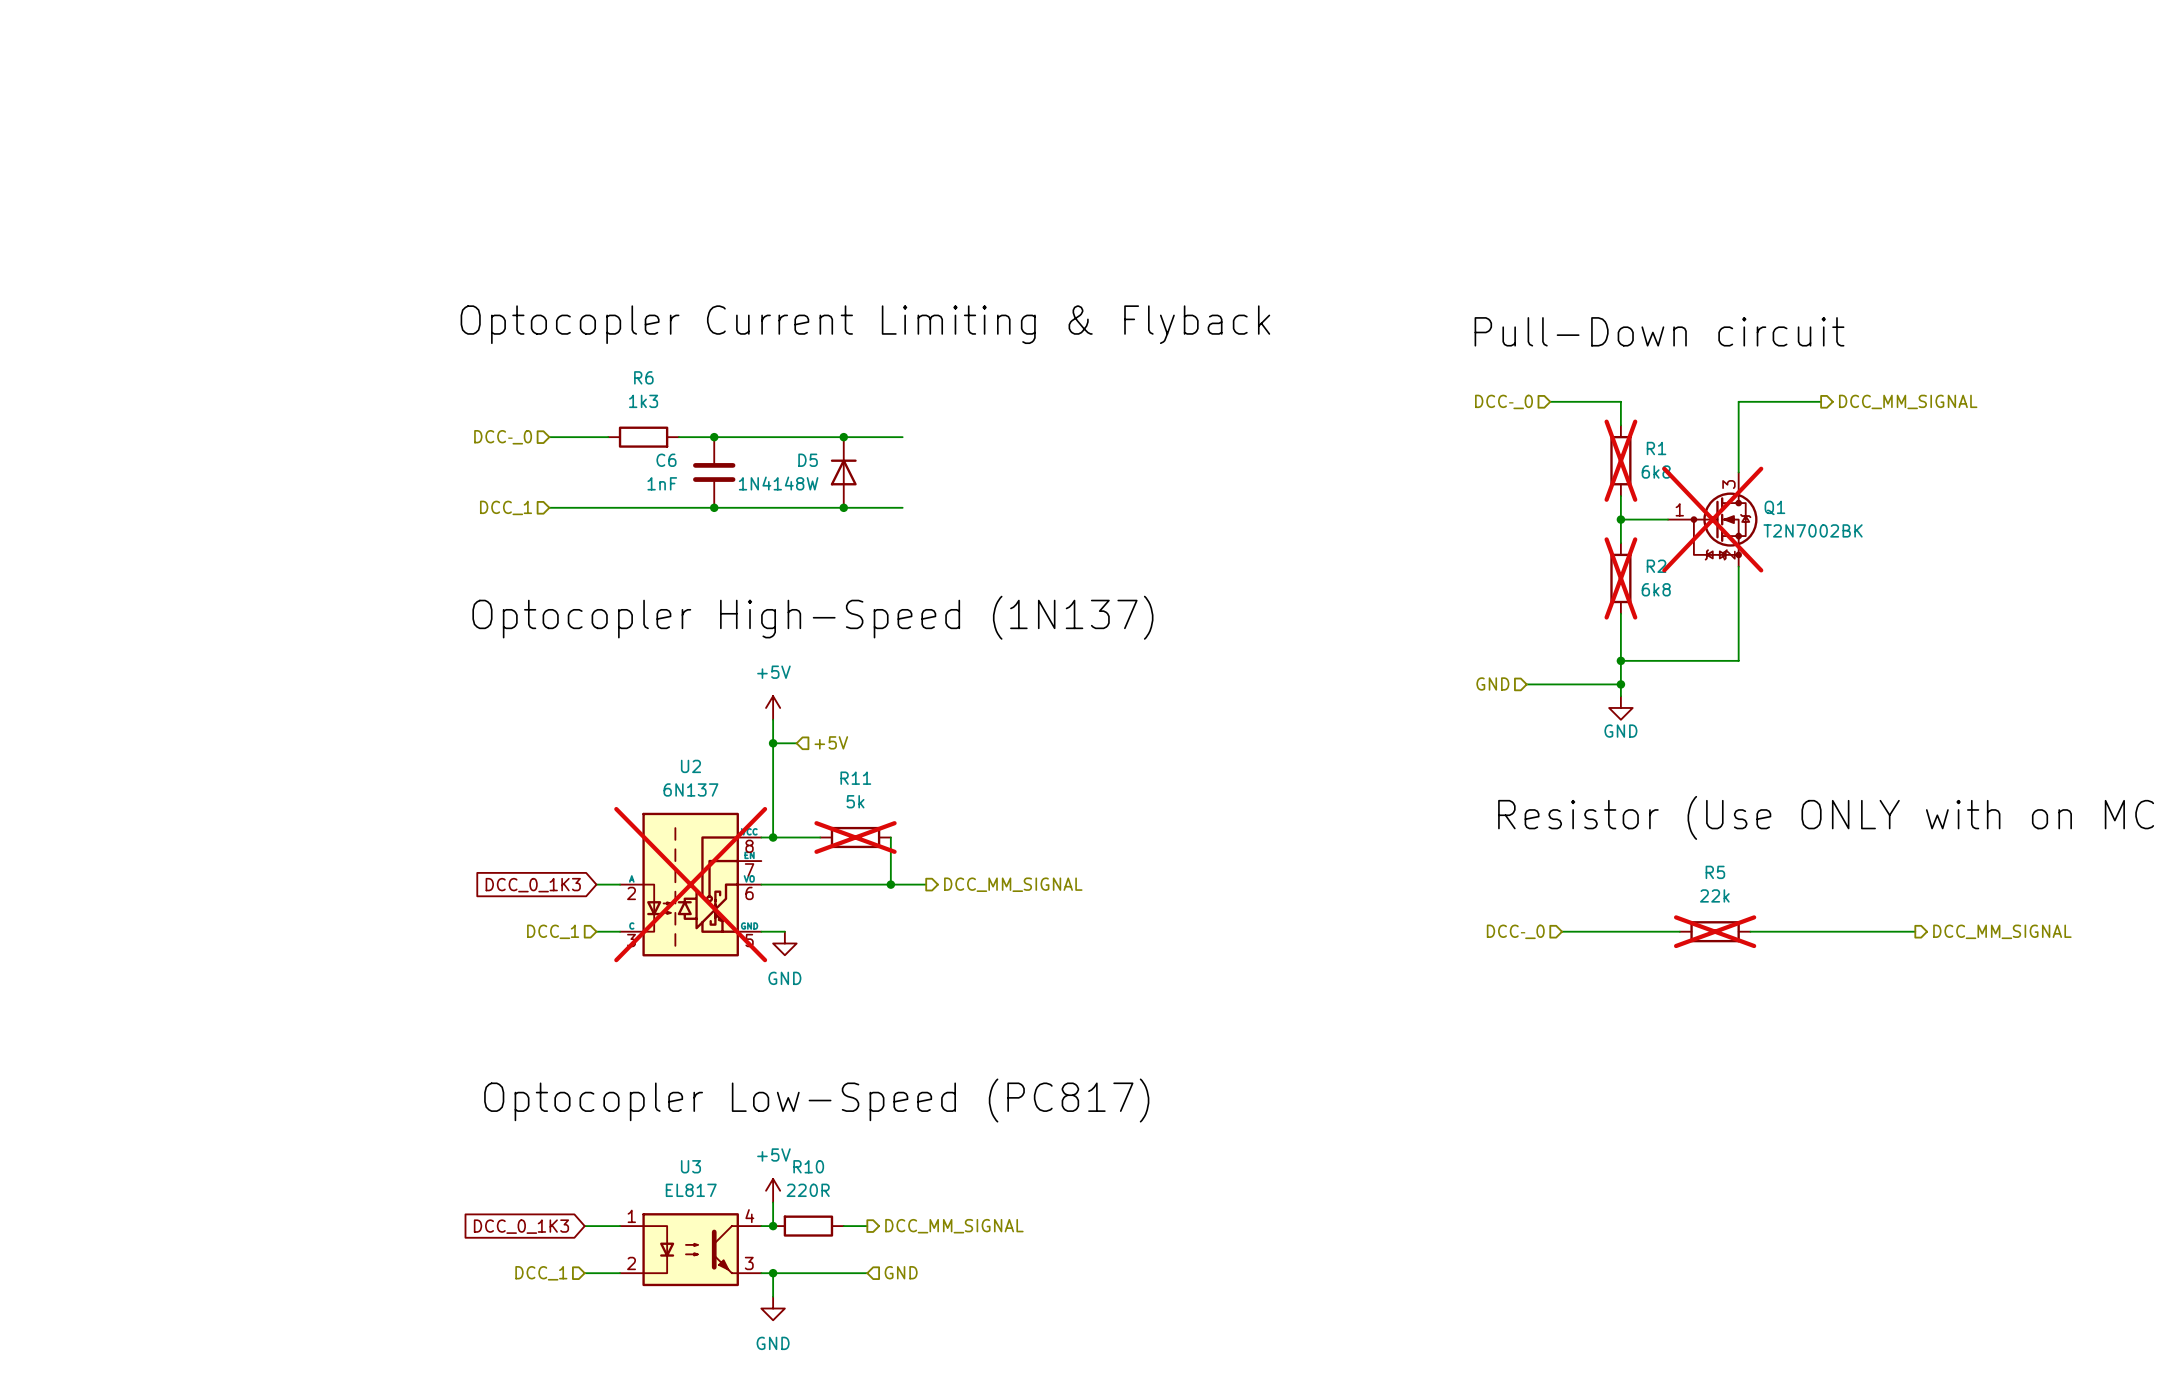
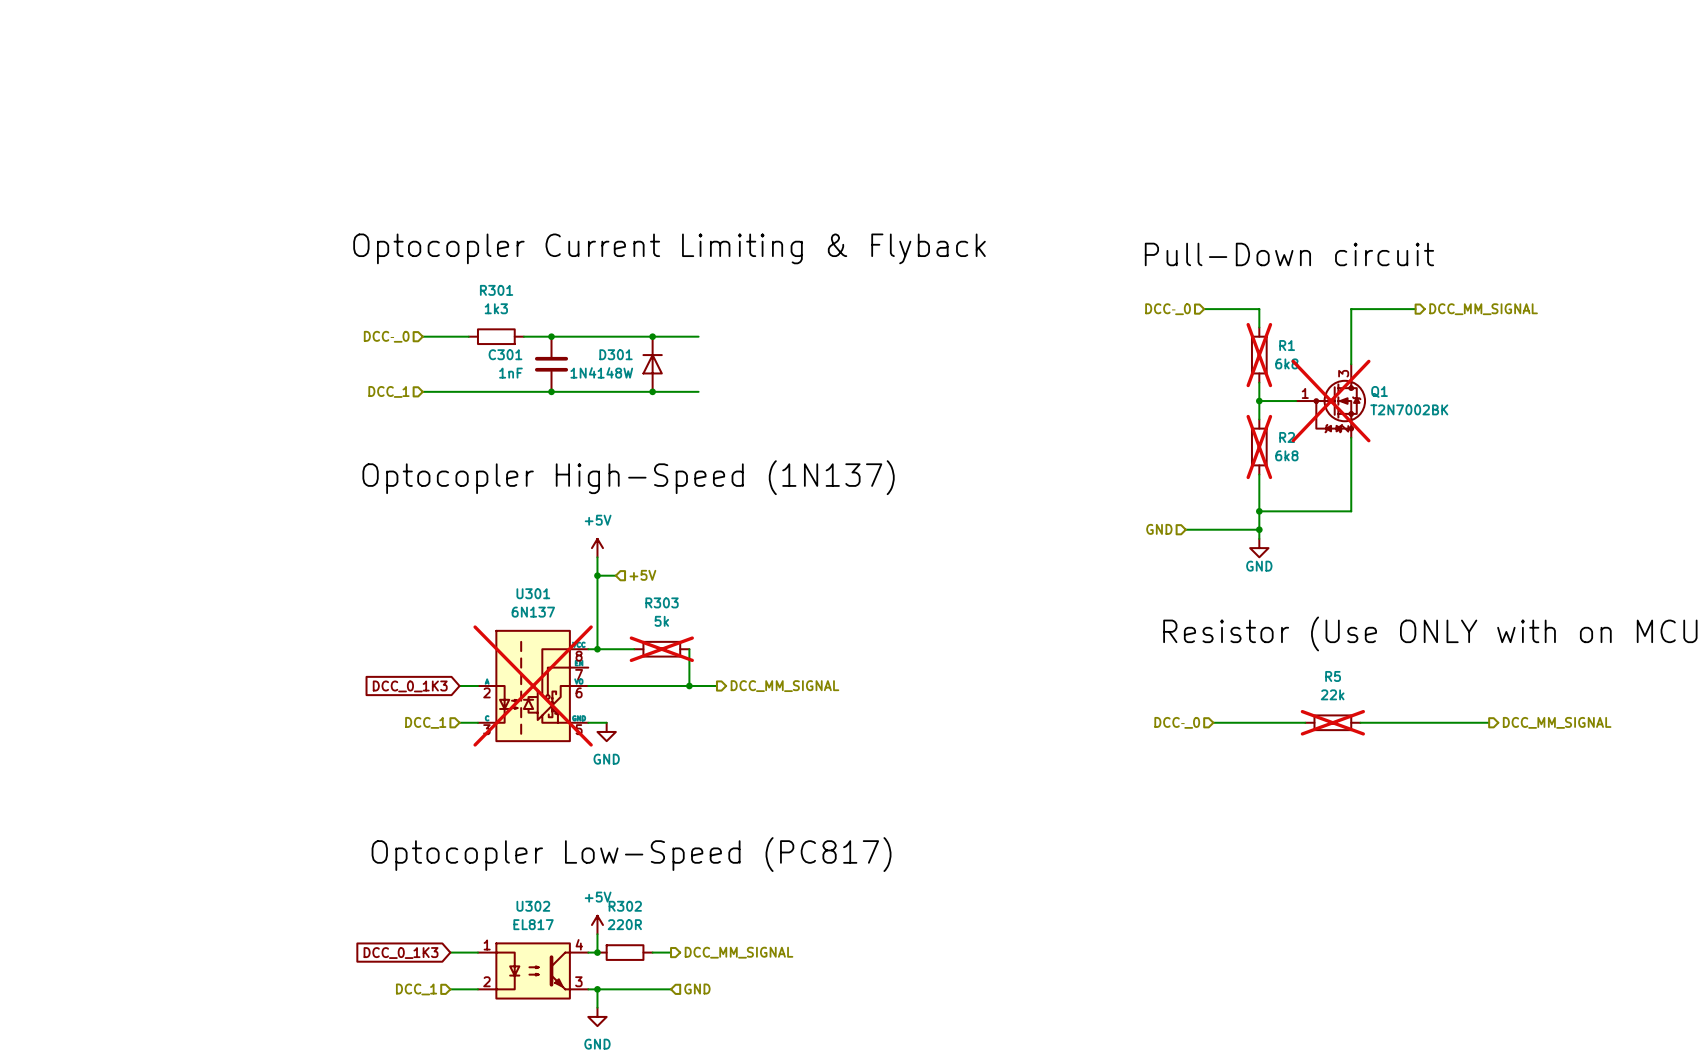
R6 name: R6 (643, 377) -> R301 (496, 290)
C6 name: C6 (666, 460) -> C301 (505, 354)
D5 name: D5 (808, 460) -> D301 (616, 354)
U2 name: U2 (690, 766) -> U301 (533, 593)
R11 name: R11 (855, 778) -> R303 (662, 602)
U3 name: U3 (690, 1166) -> U302 (533, 906)
R10 name: R10 (808, 1166) -> R302 (625, 906)

